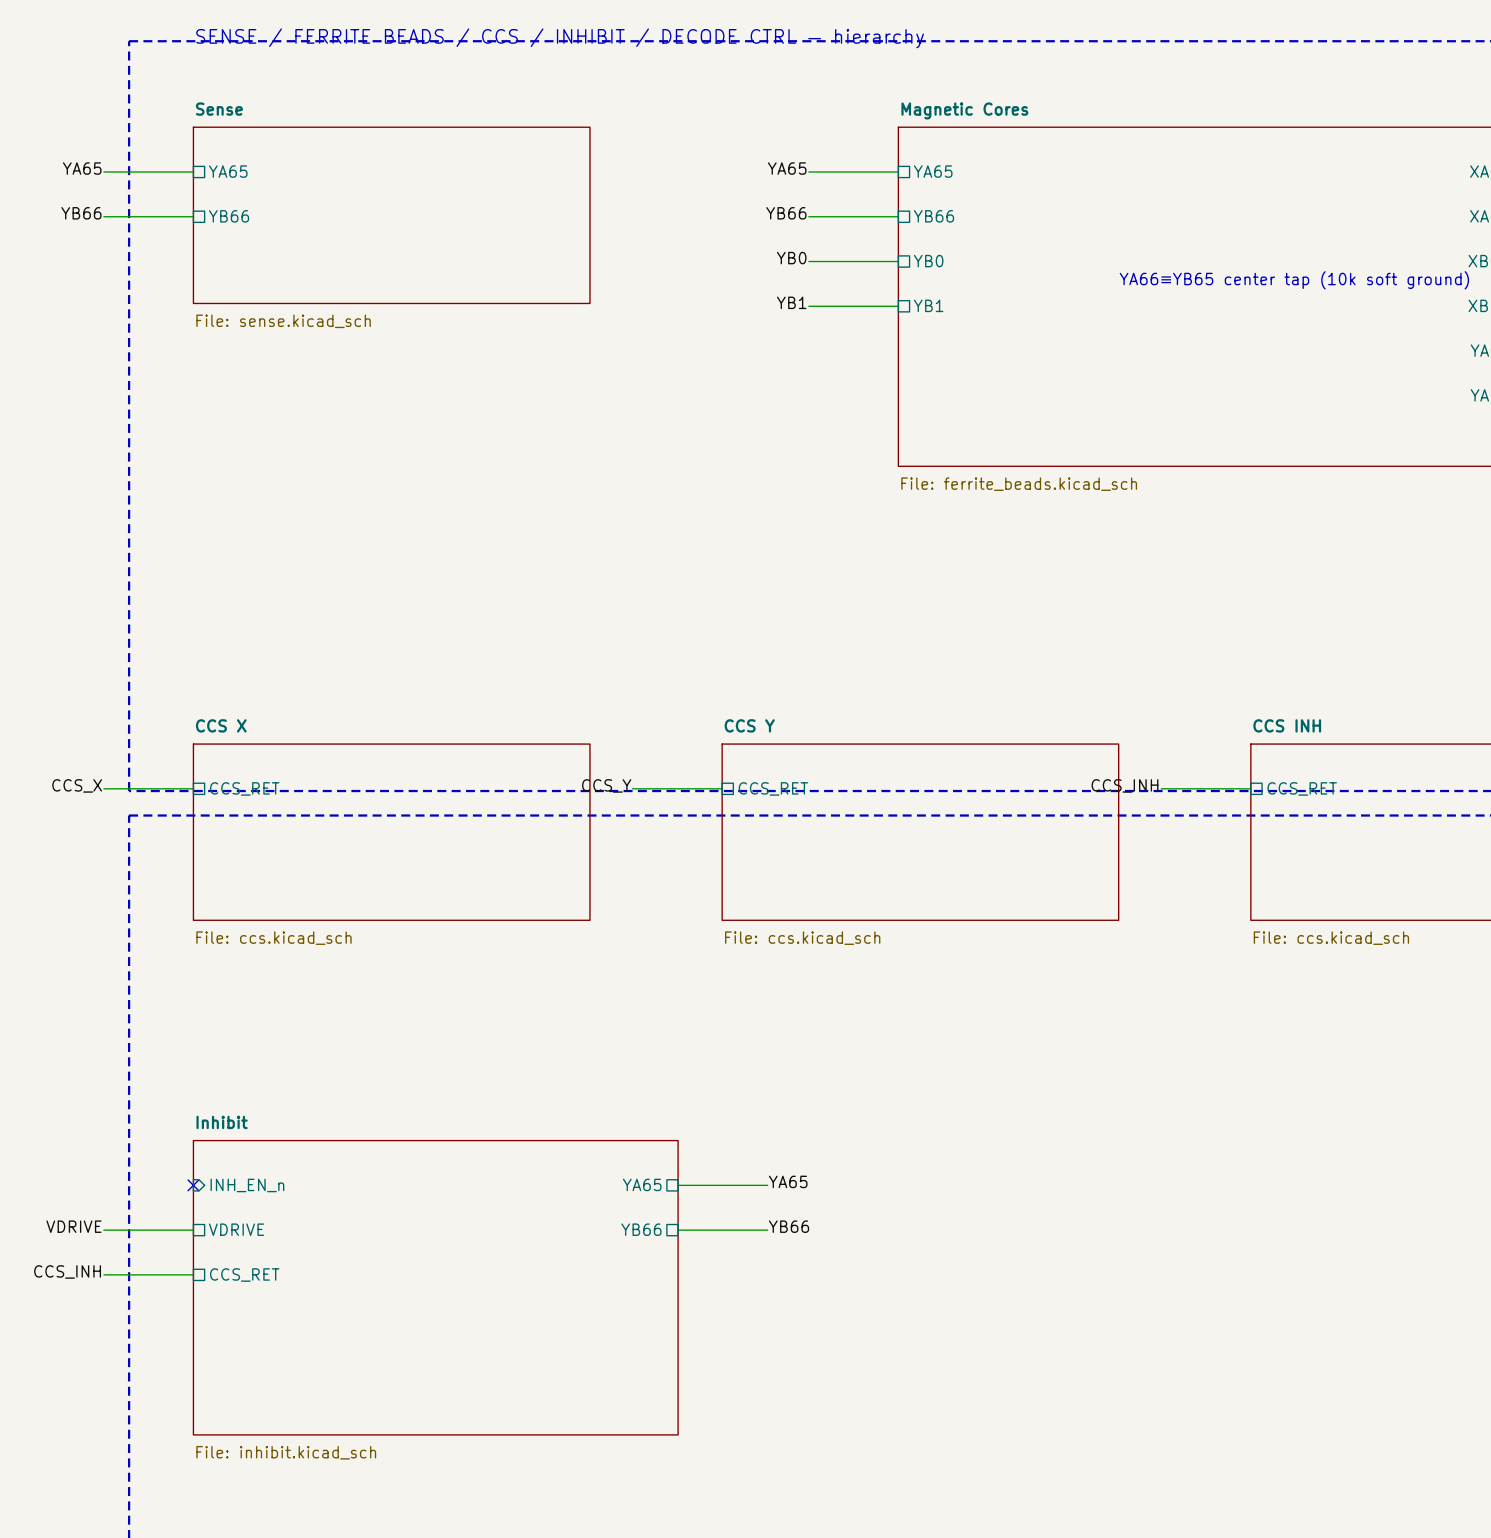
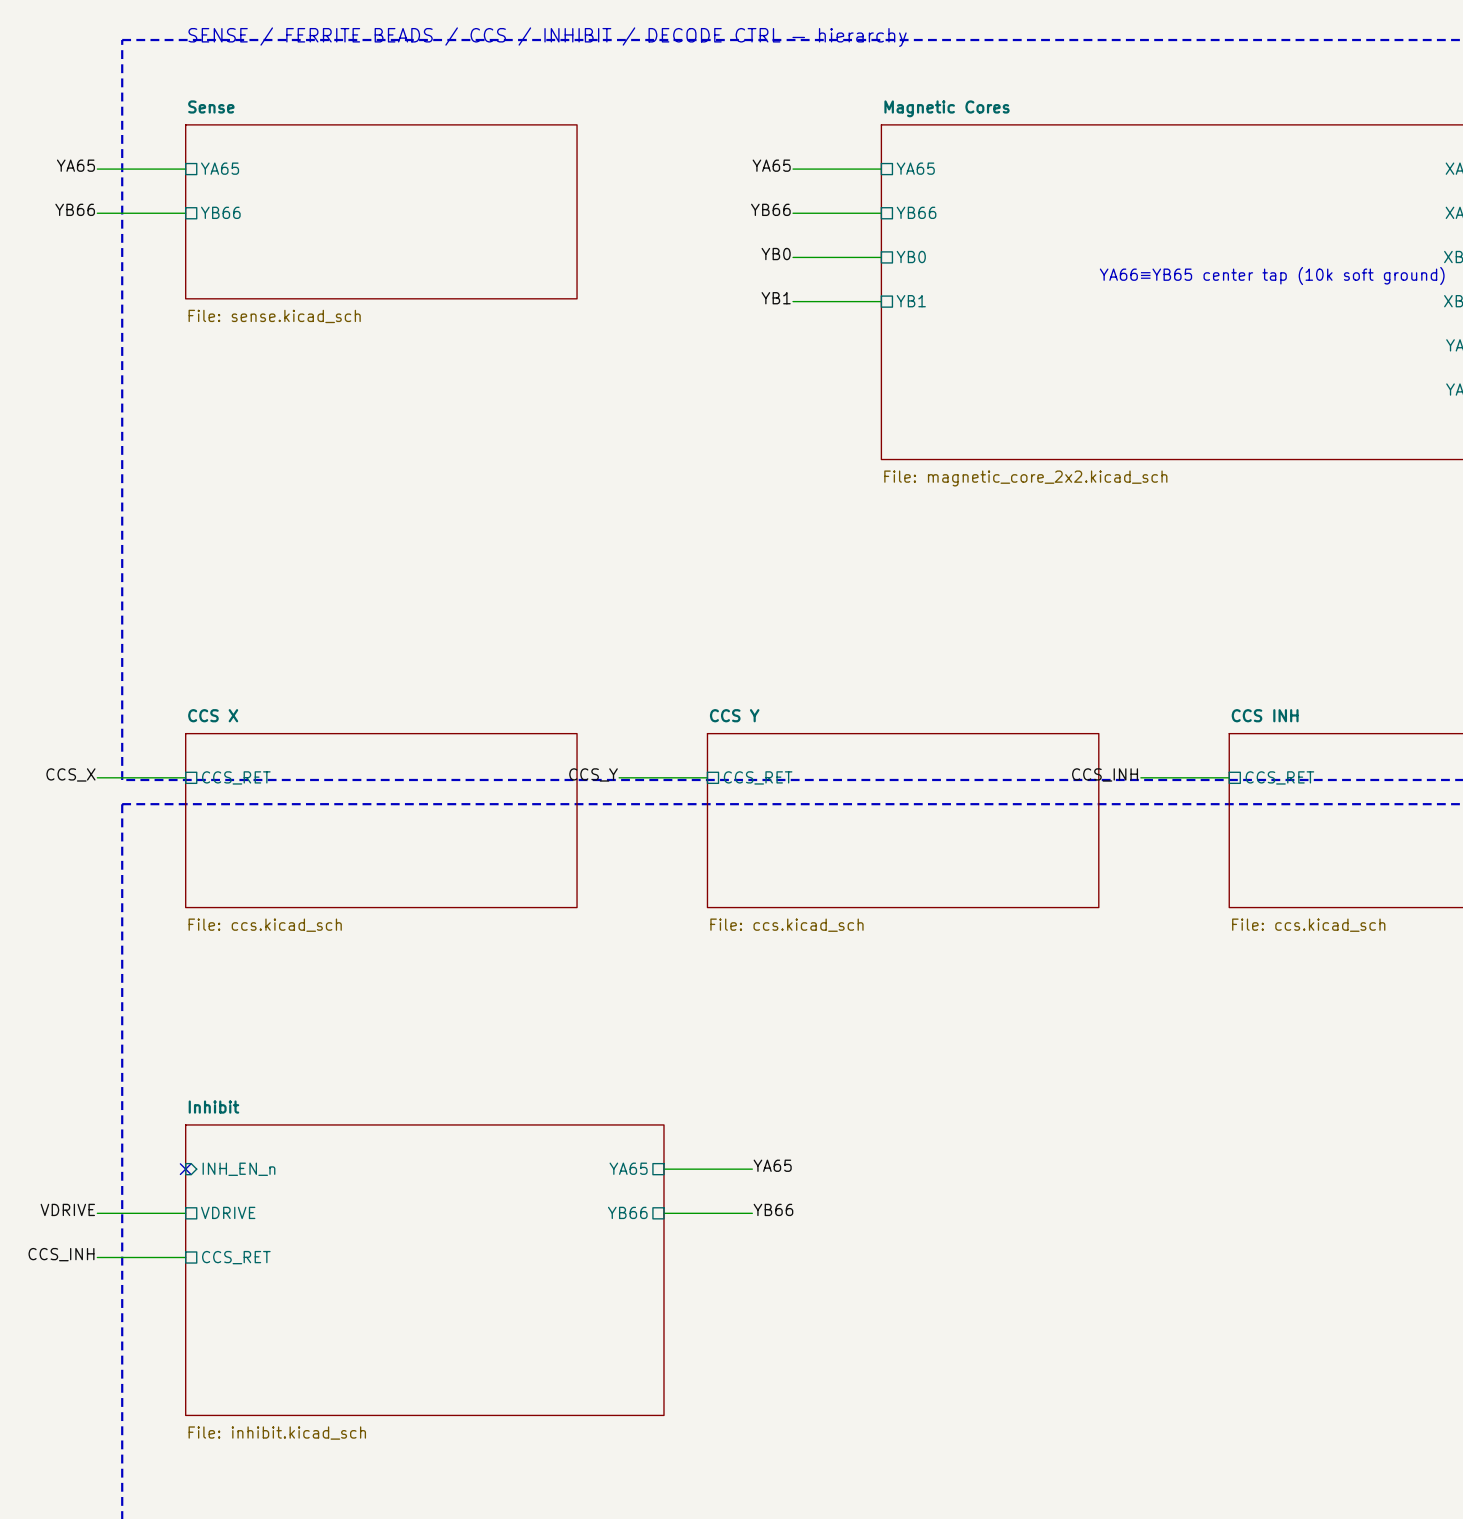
sheet Magnetic Cores value: File: ferrite_beads.kicad_sch (1019, 484) -> File: magnetic_core_2x2.kicad_sch (1025, 478)

